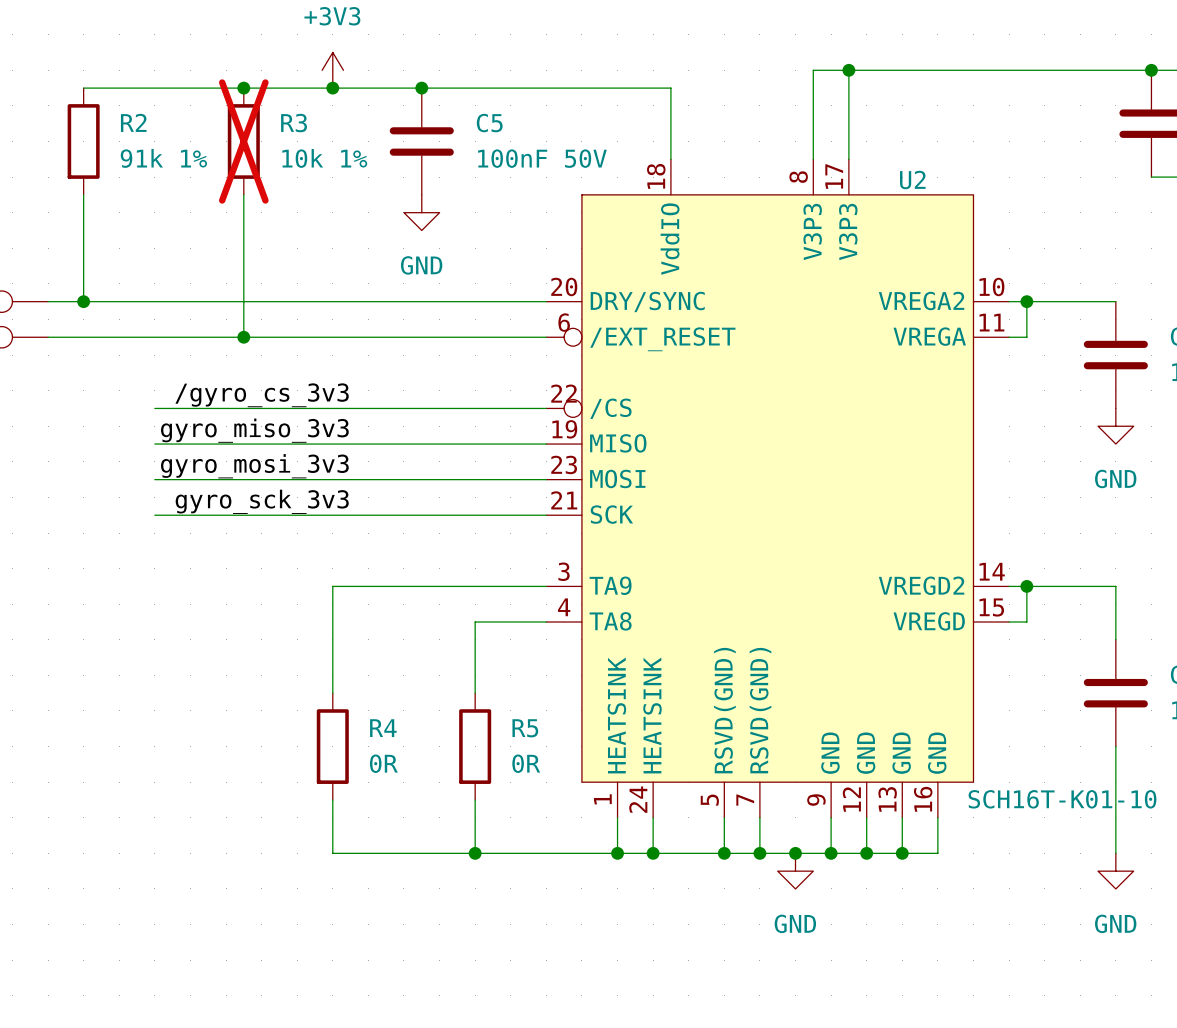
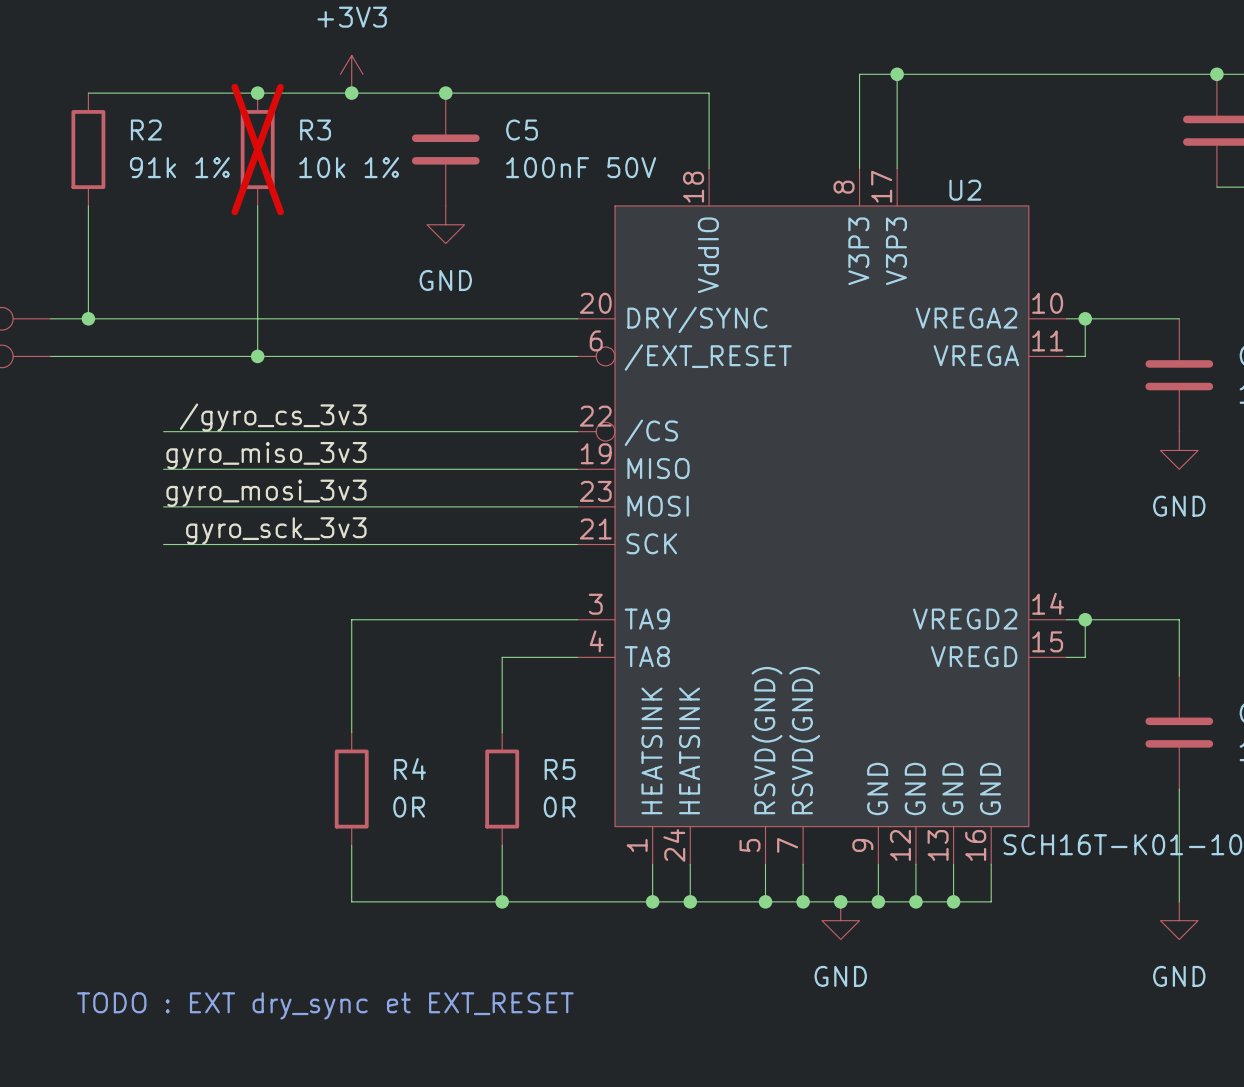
text: none -> TODO : EXT dry_sync et EXT_RESET (325, 1005)

